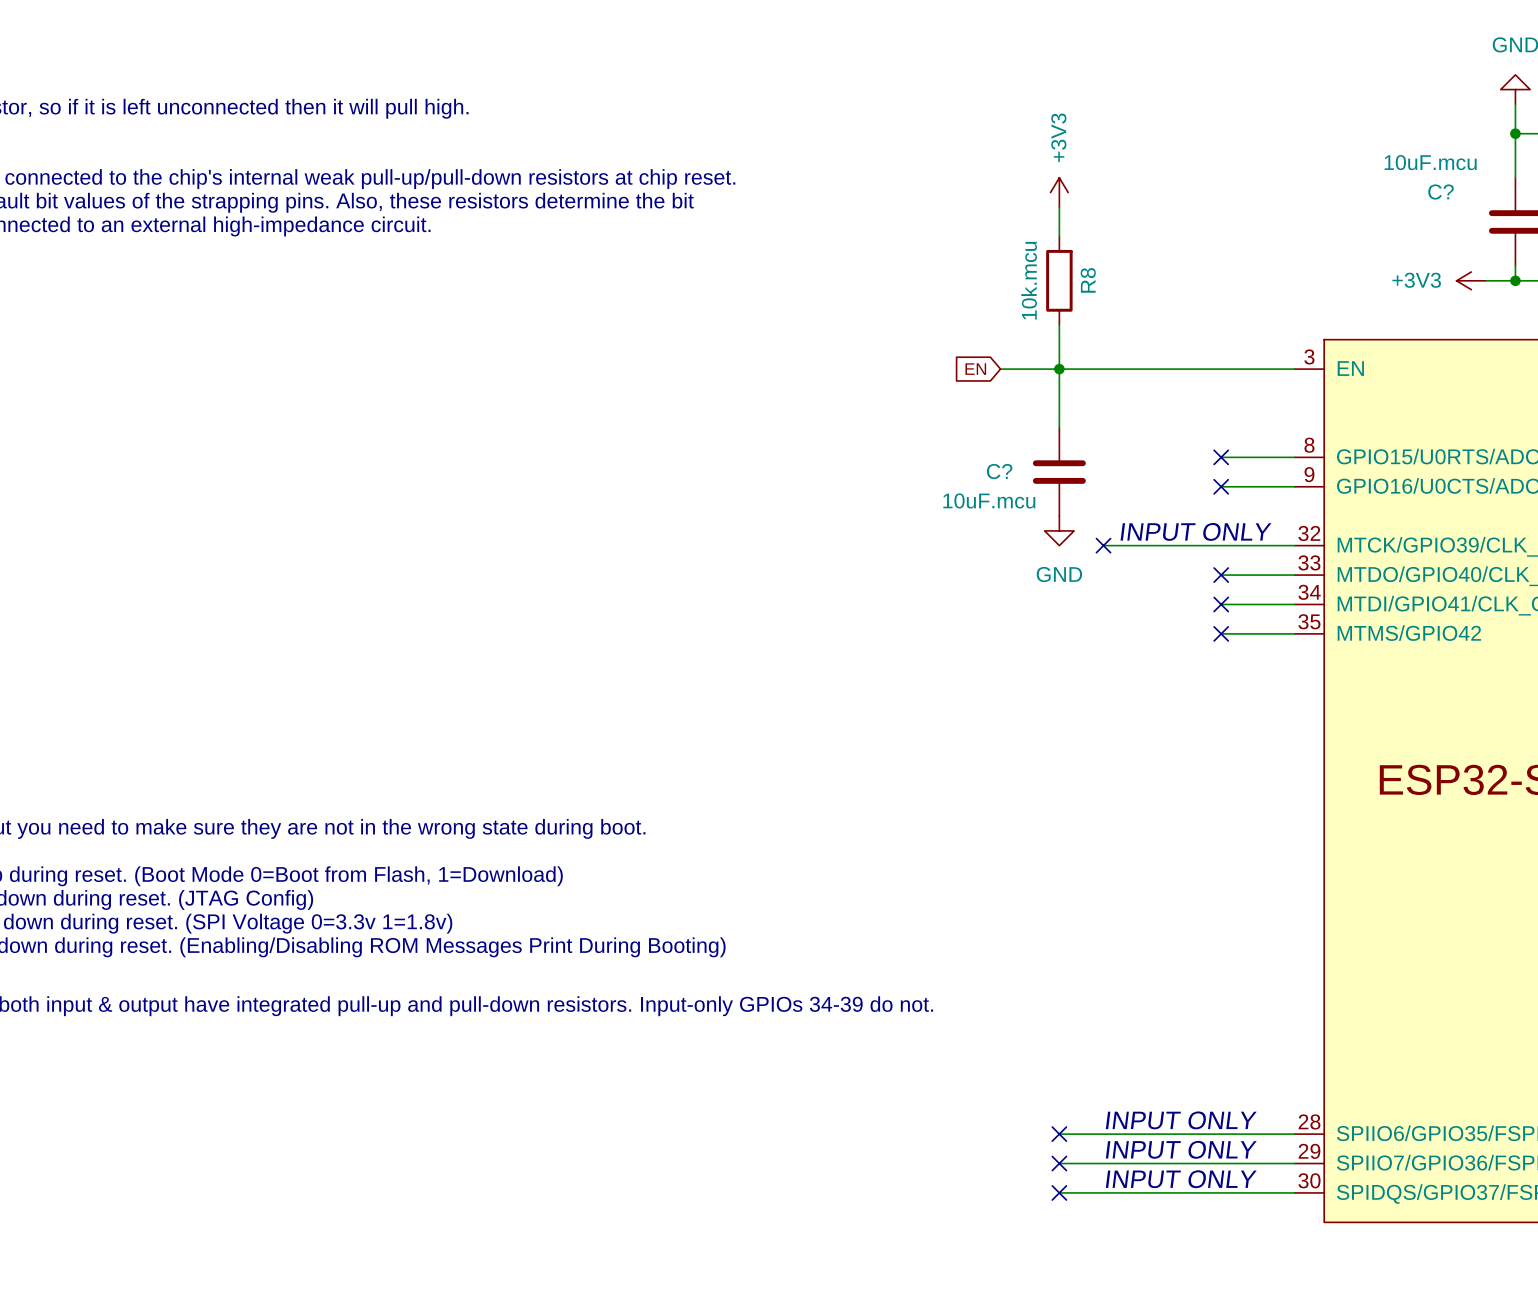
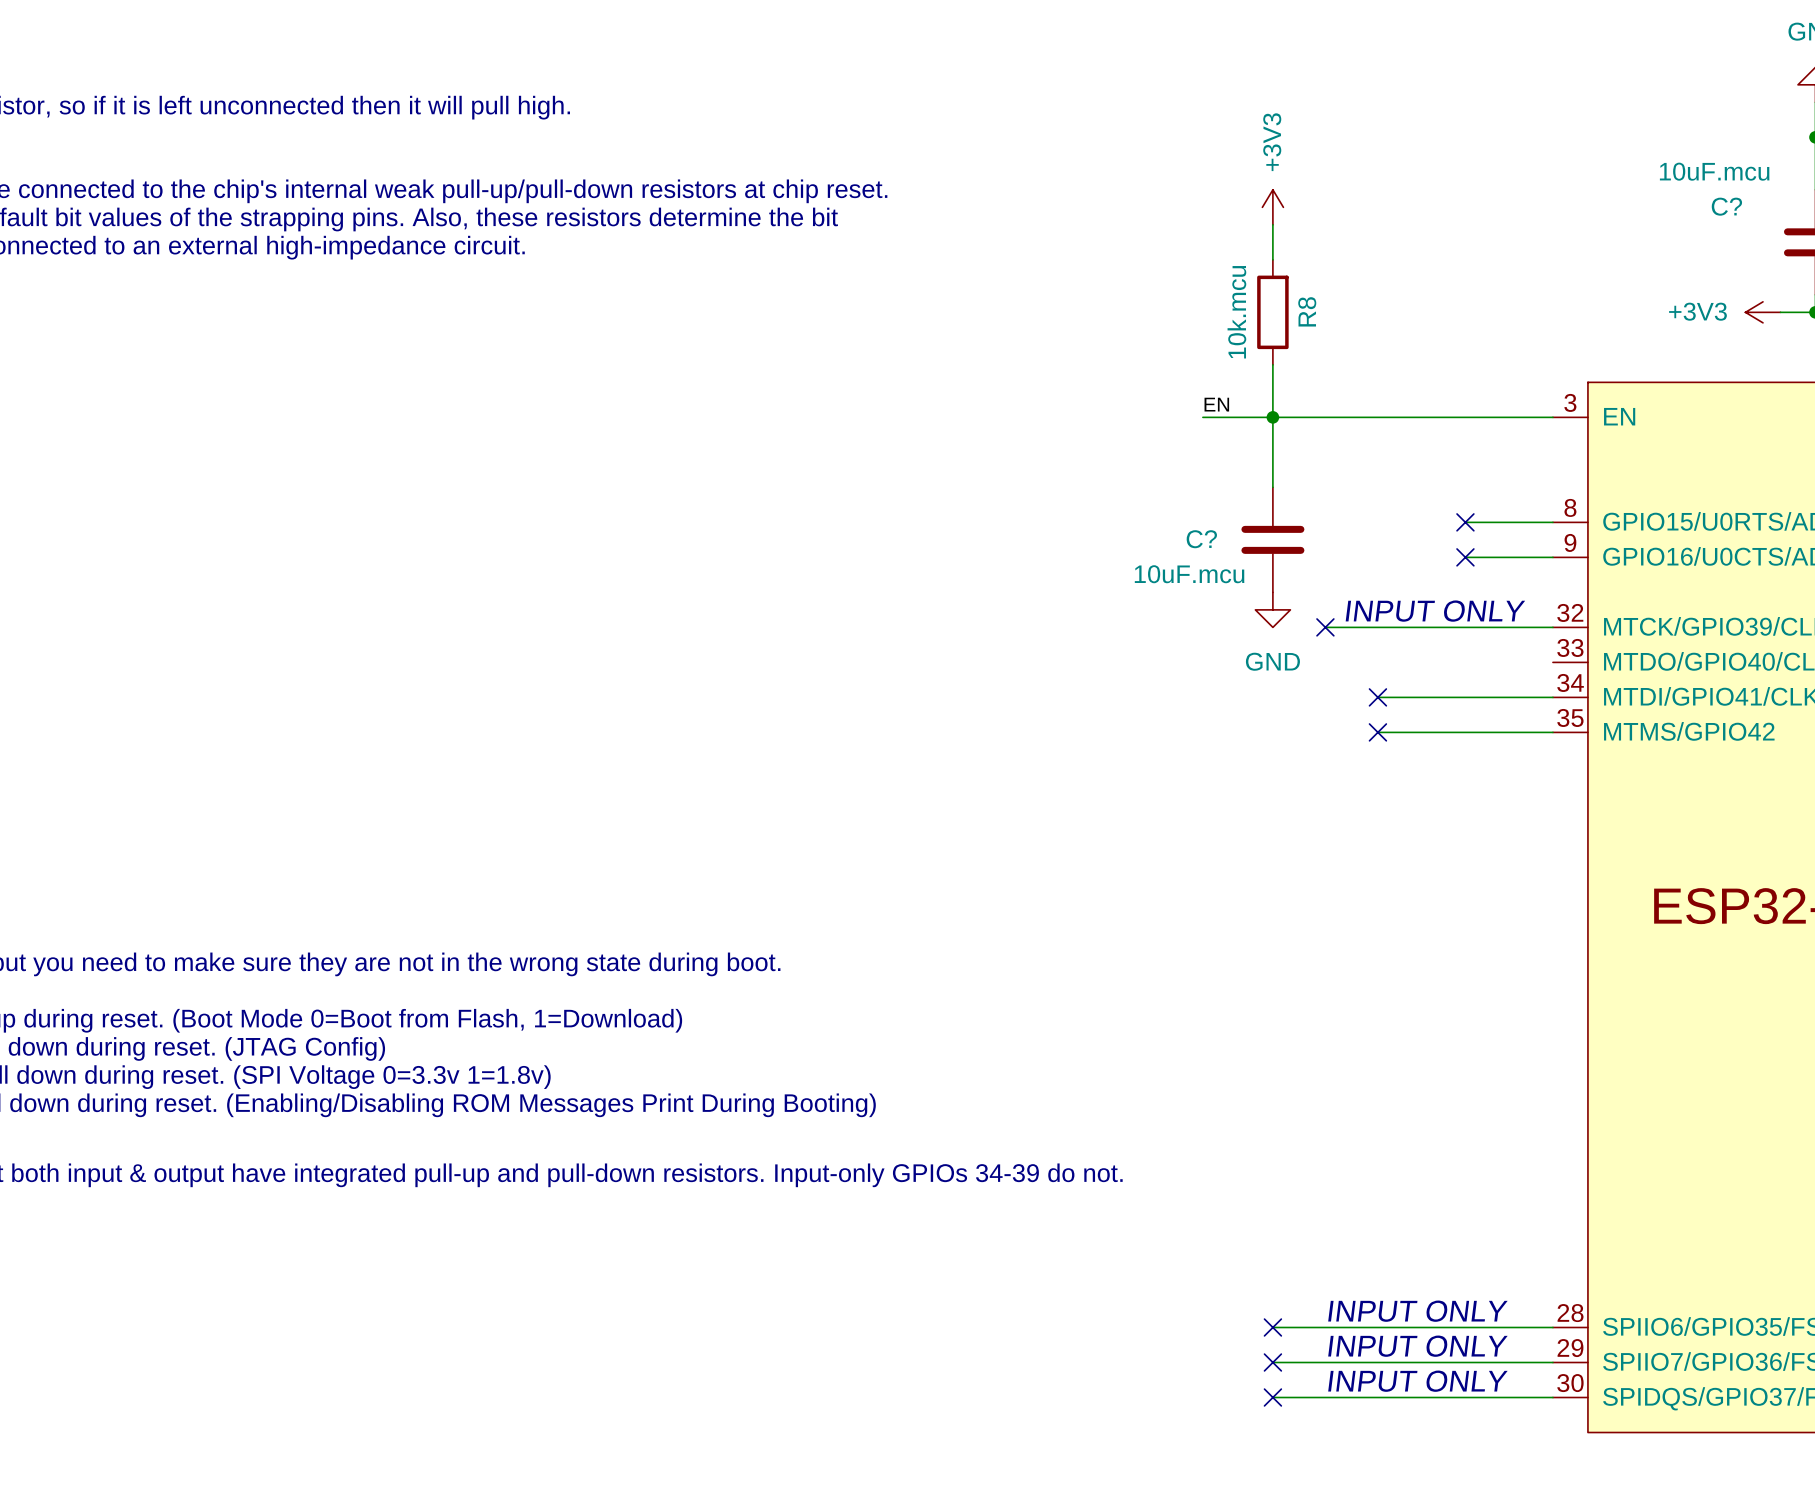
label: none -> EN (1216, 404)
global label: EN (975, 369) -> none
wire: (1221, 575) (1294, 575) -> (1377, 697) (1465, 697)
no-connect mark: (1221, 575) -> none
no-connect mark: none -> (1377, 697)
no-connect mark: (1221, 604) -> none
wire: none -> (1377, 732) (1465, 732)
no-connect mark: none -> (1377, 732)
no-connect mark: (1221, 633) -> none

